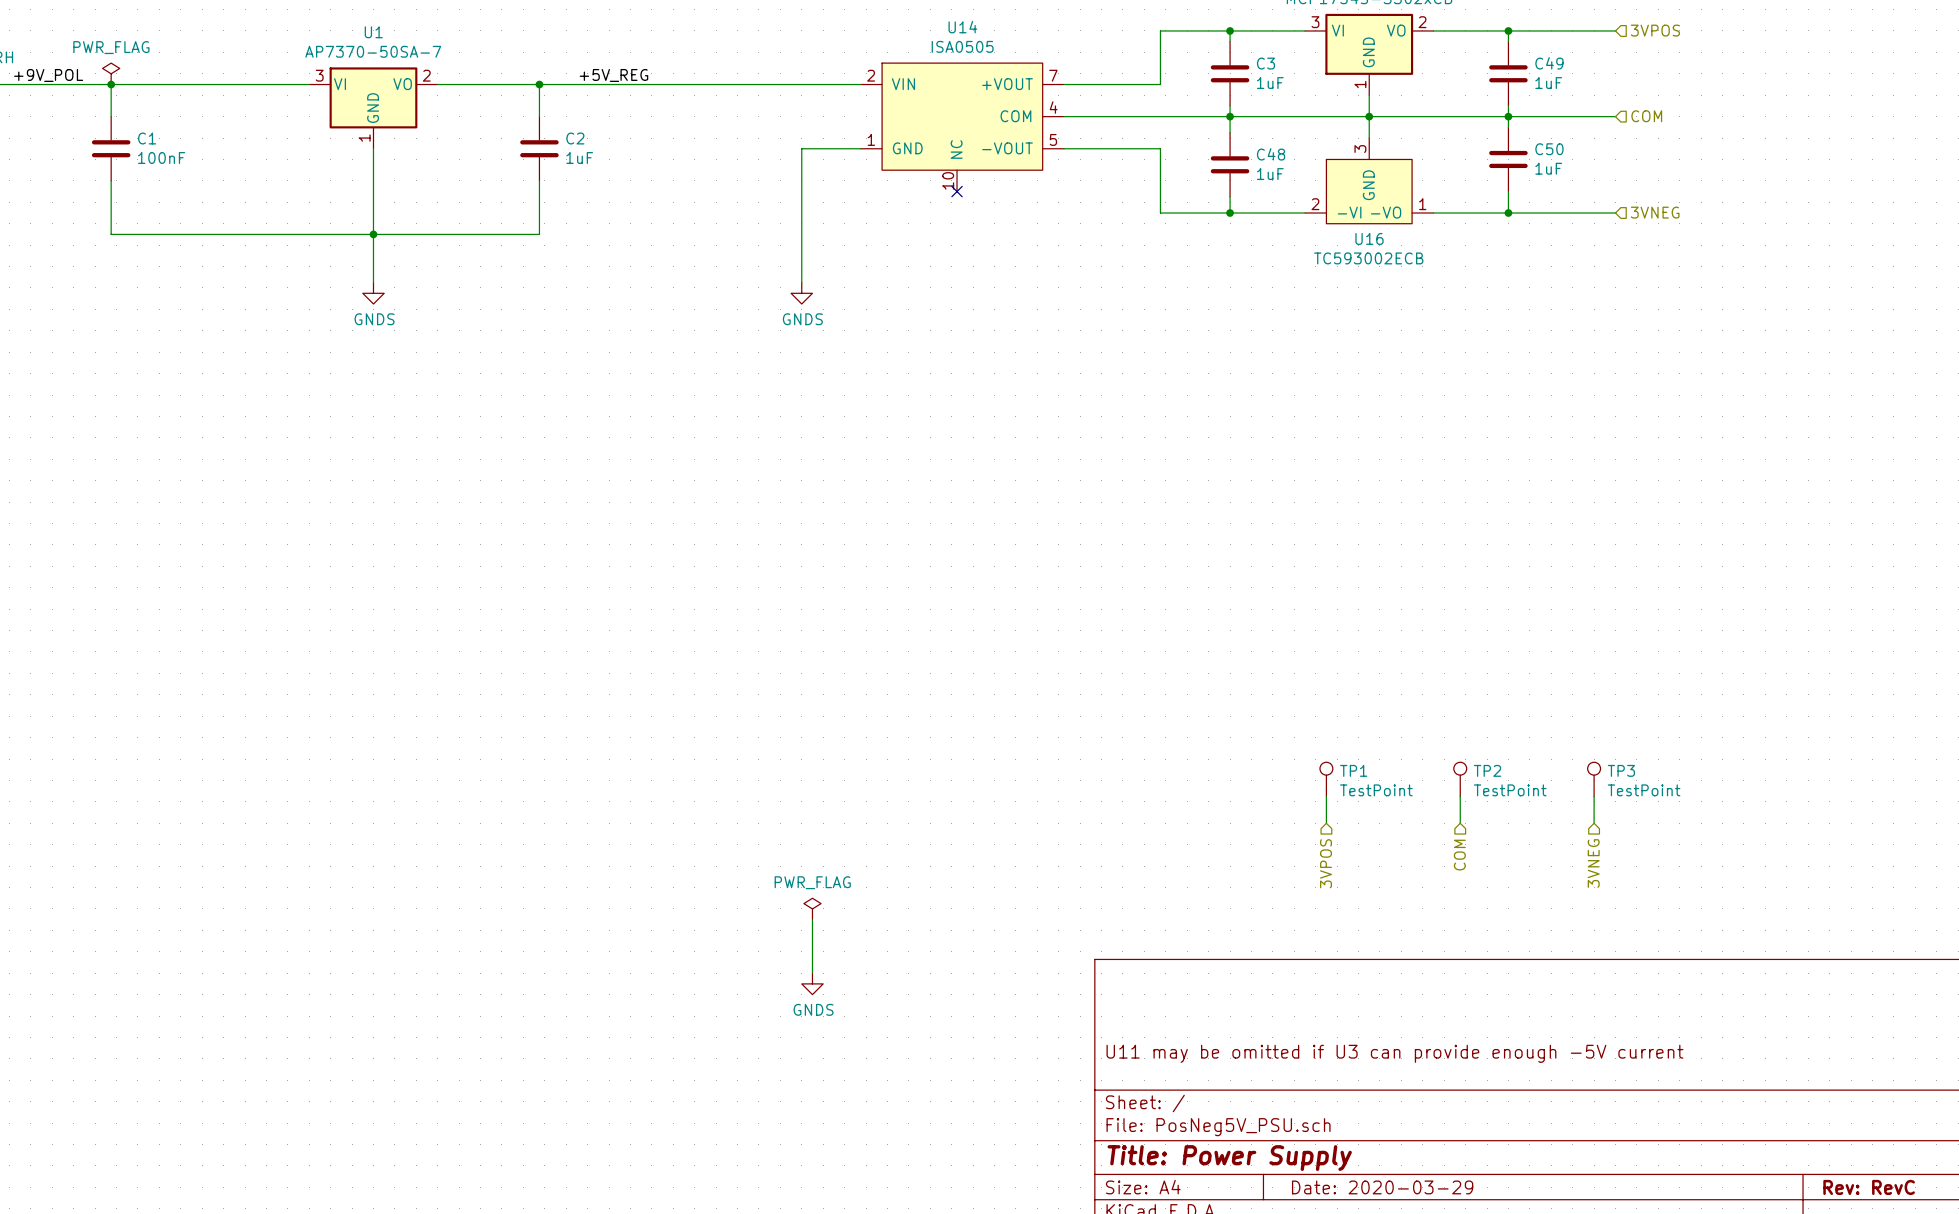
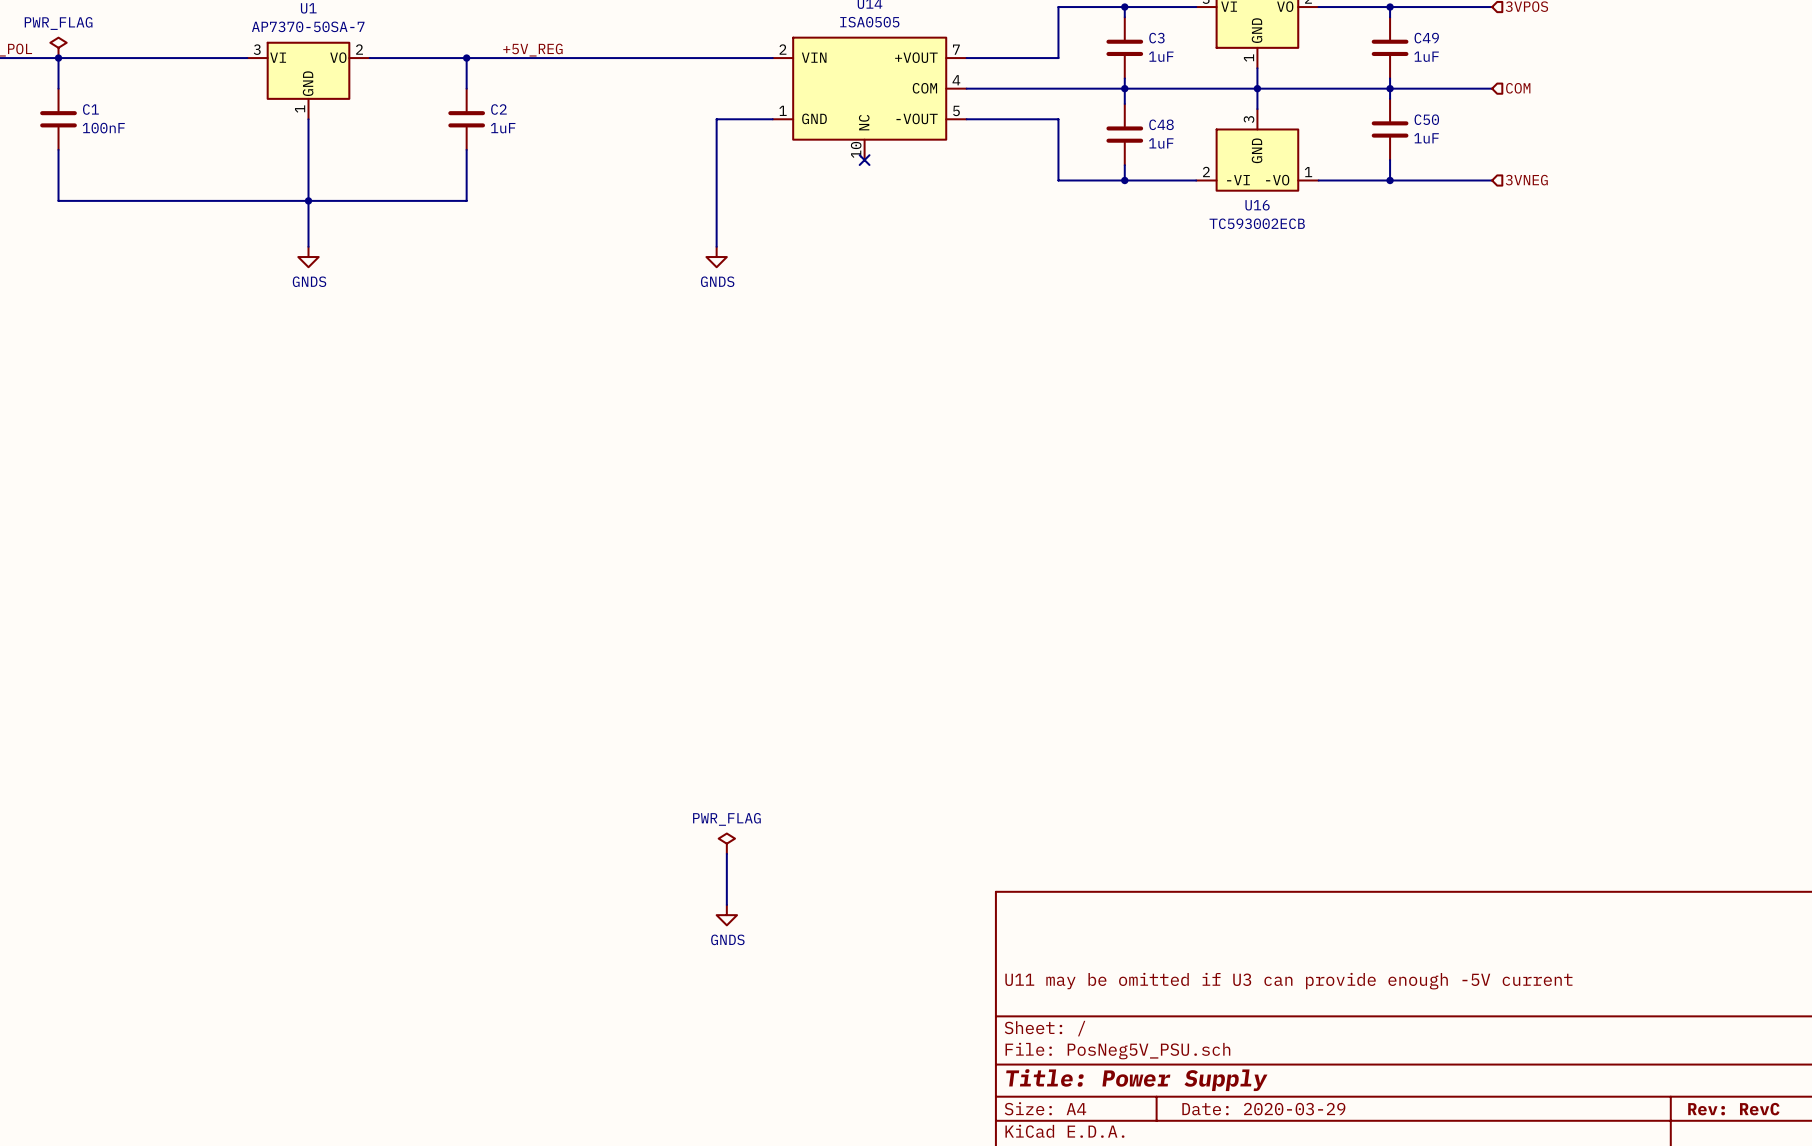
TP1: TestPoint (1326, 779) -> none
TP2: TestPoint (1460, 779) -> none
TP3: TestPoint (1594, 779) -> none
wire: (1326, 796) (1326, 823) -> none
wire: (1460, 796) (1460, 823) -> none
wire: (1594, 796) (1594, 823) -> none
hierarchical label: COM (1459, 855) -> none
hierarchical label: 3VPOS (1326, 863) -> none
hierarchical label: 3VNEG (1593, 863) -> none

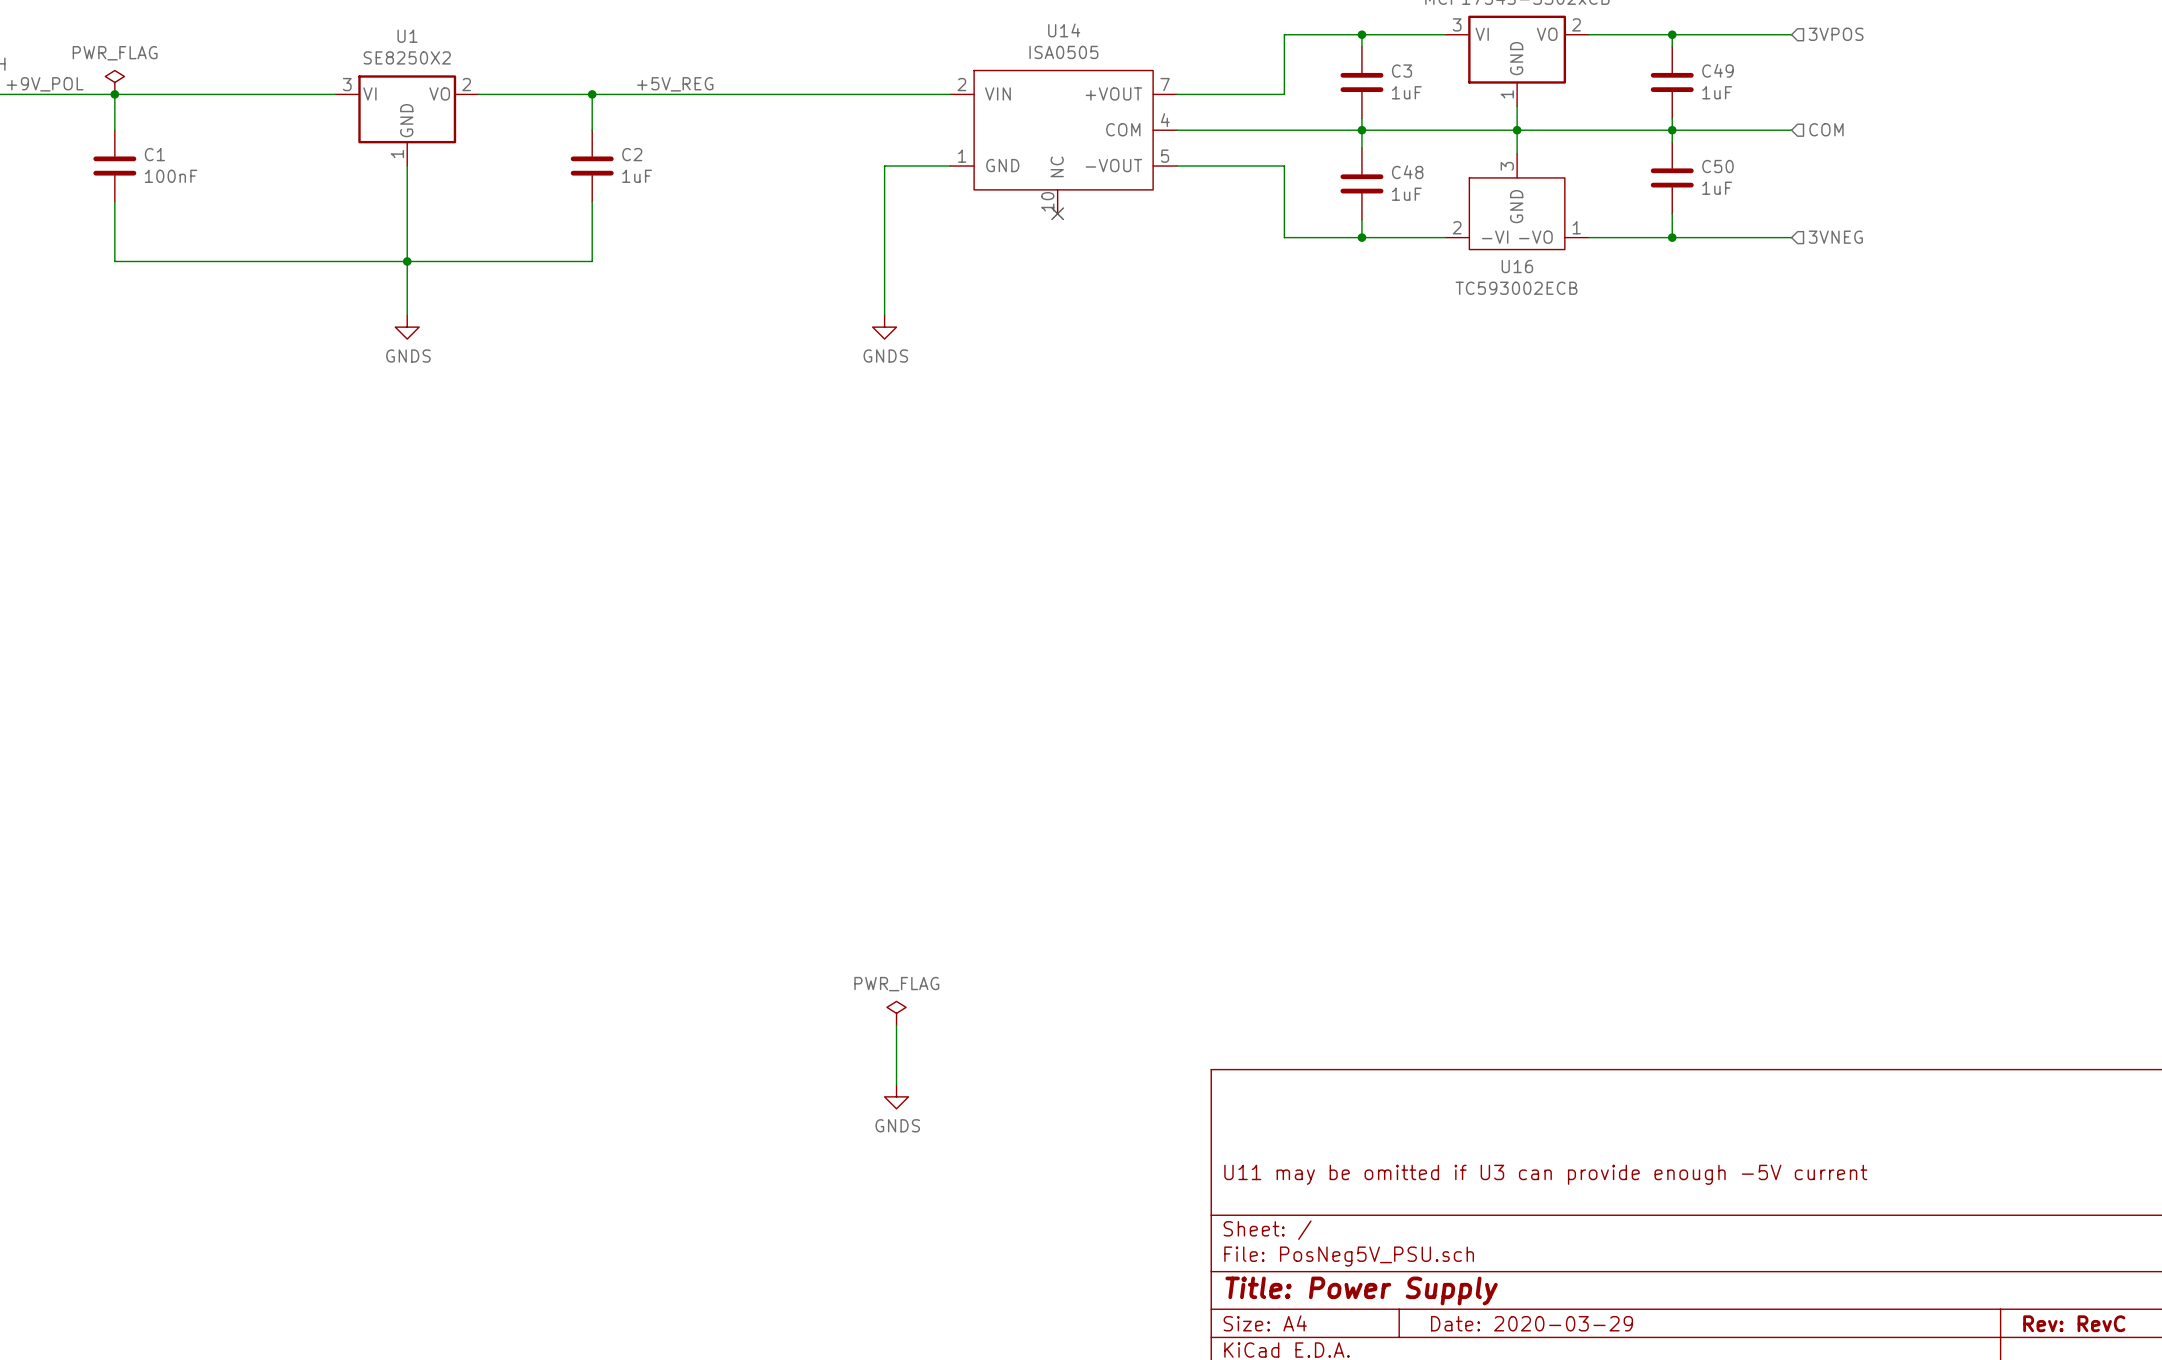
U1 value: AP7370-50SA-7 (308, 26) -> SE8250X2 (407, 57)

